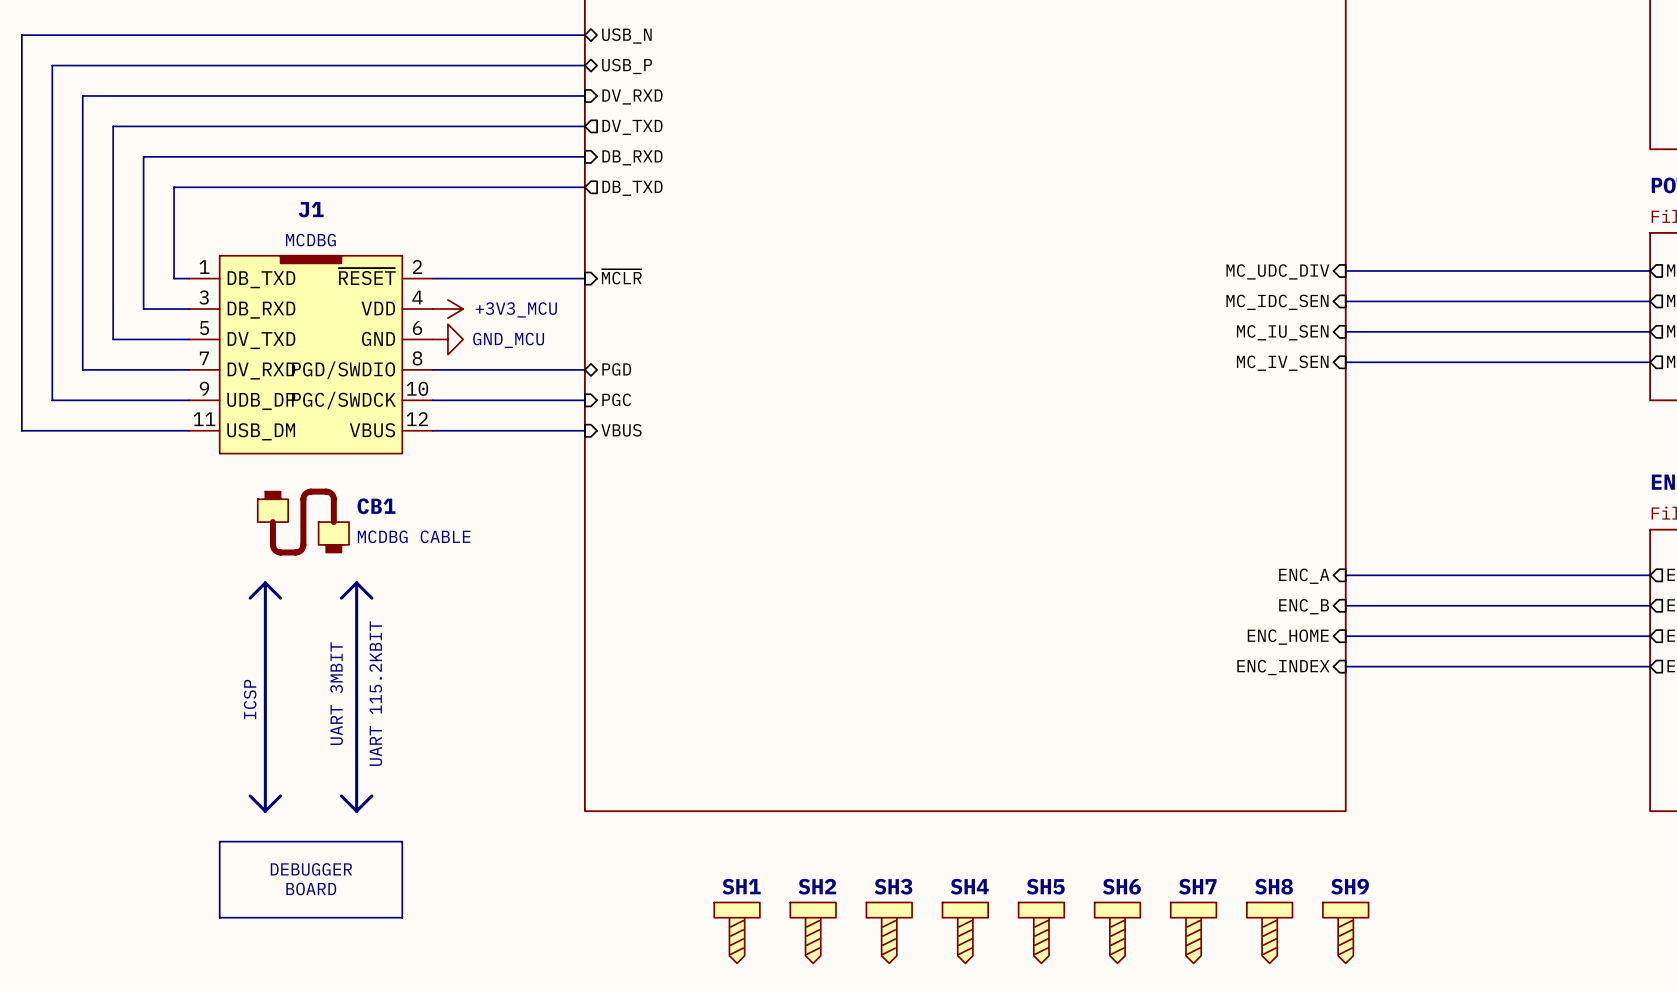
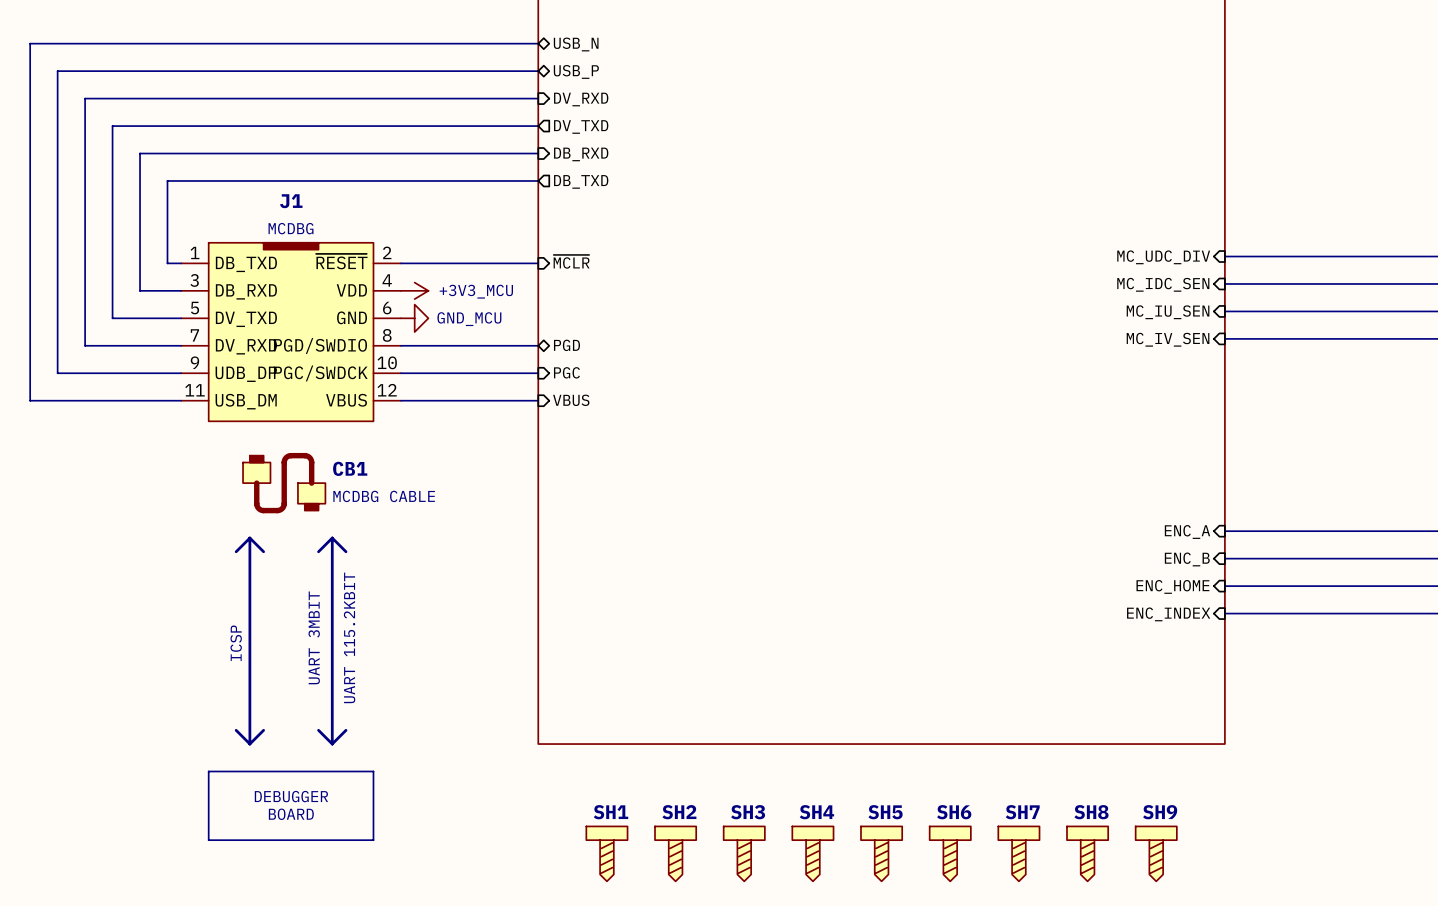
SH1 name: SH1 (741, 886) -> SH2 (679, 812)
SH2 name: SH2 (817, 886) -> SH3 (748, 812)
SH3 name: SH3 (893, 886) -> SH4 (816, 812)
SH4 name: SH4 (969, 886) -> SH5 (885, 812)
SH5 name: SH5 (1045, 886) -> SH6 (954, 812)
SH6 name: SH6 (1121, 886) -> SH7 (1022, 812)
SH7 name: SH7 (1197, 886) -> SH8 (1091, 812)
SH8 name: SH8 (1274, 886) -> SH9 (1160, 812)
SH1: none -> (606, 853)
SH9: (1345, 932) -> none

